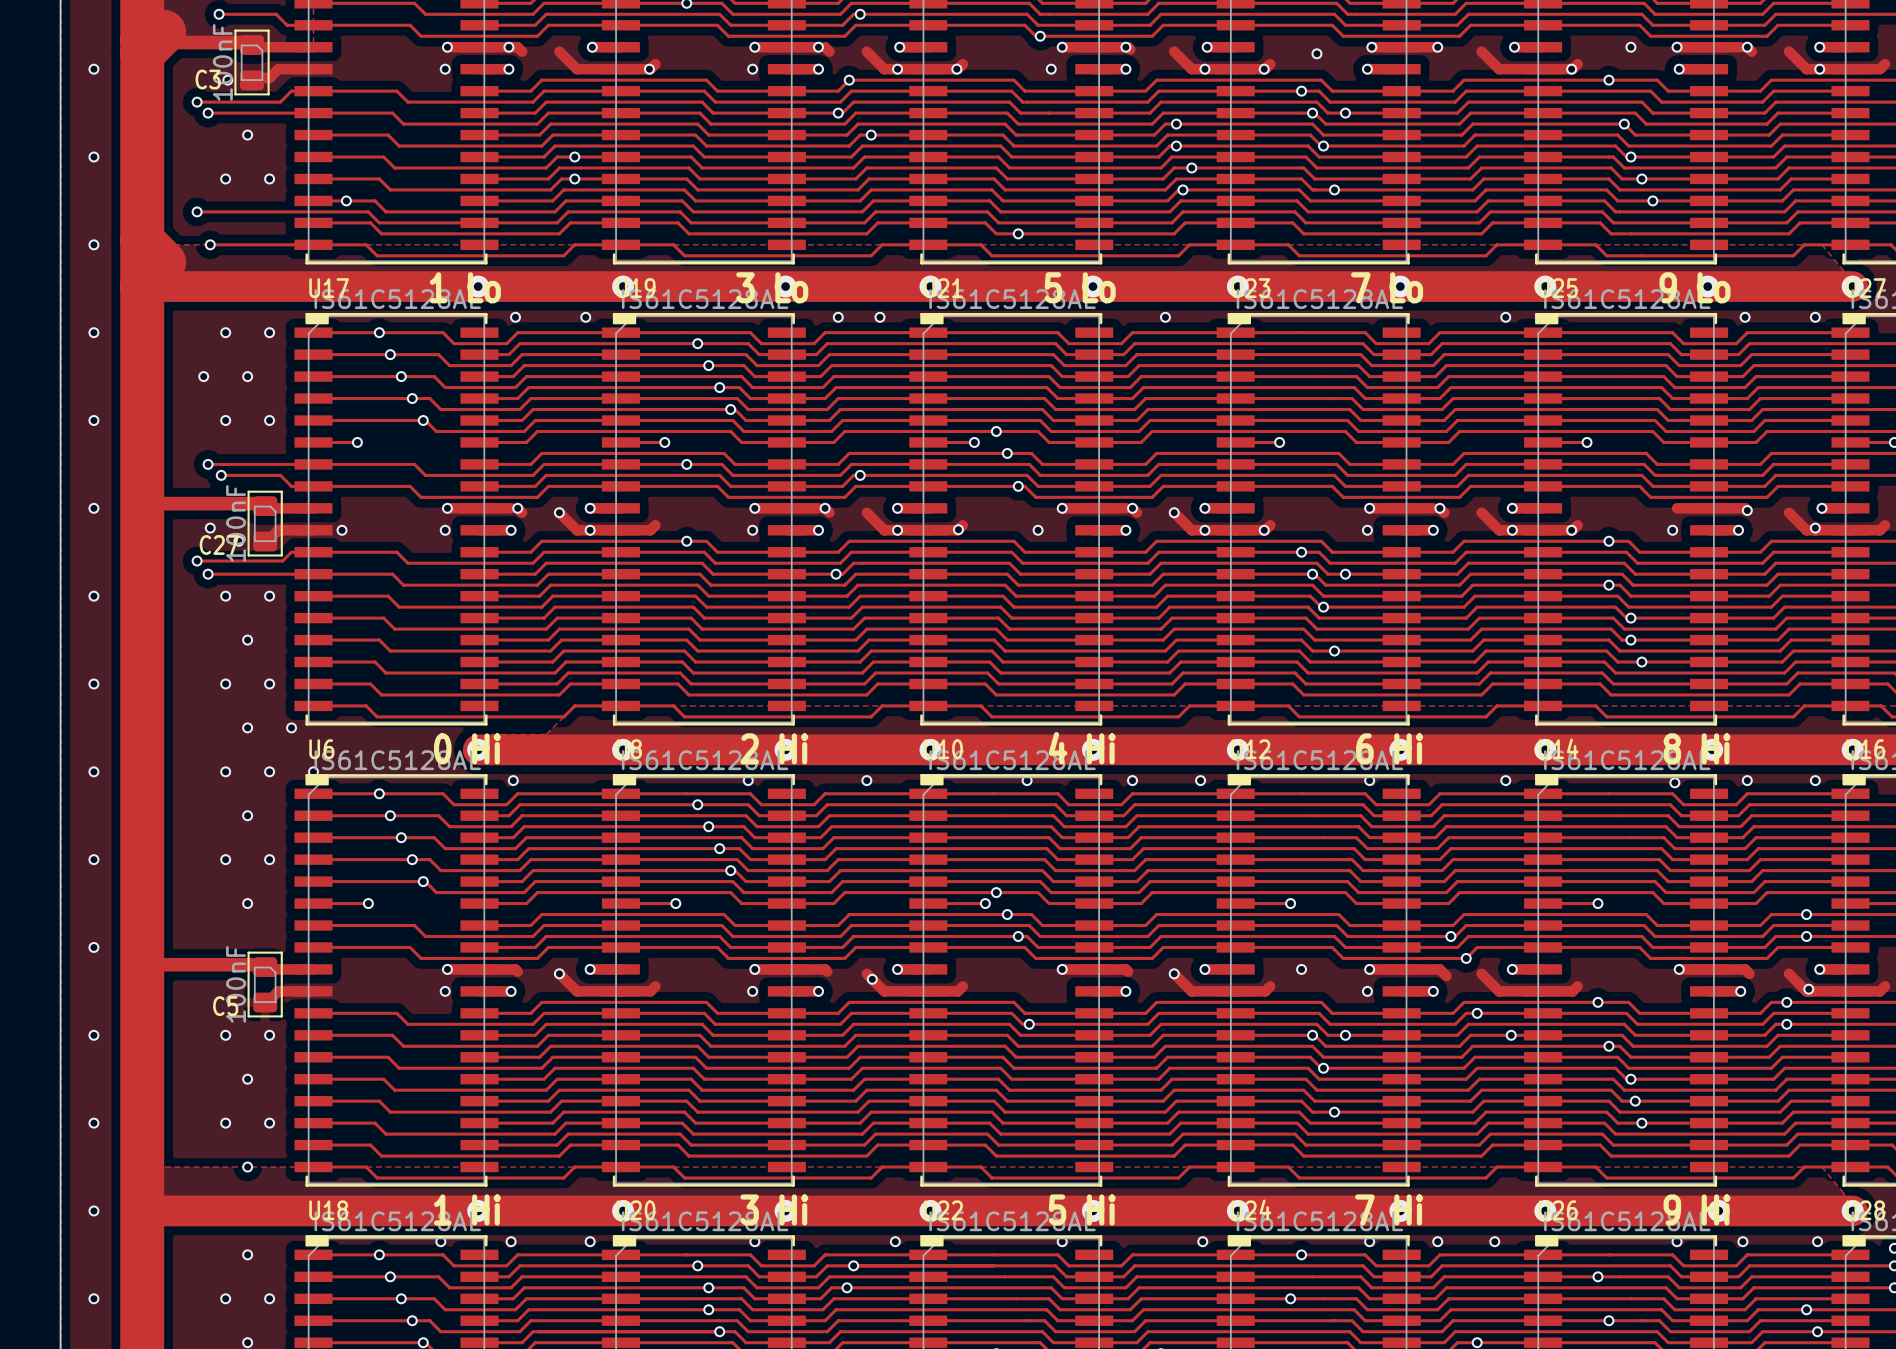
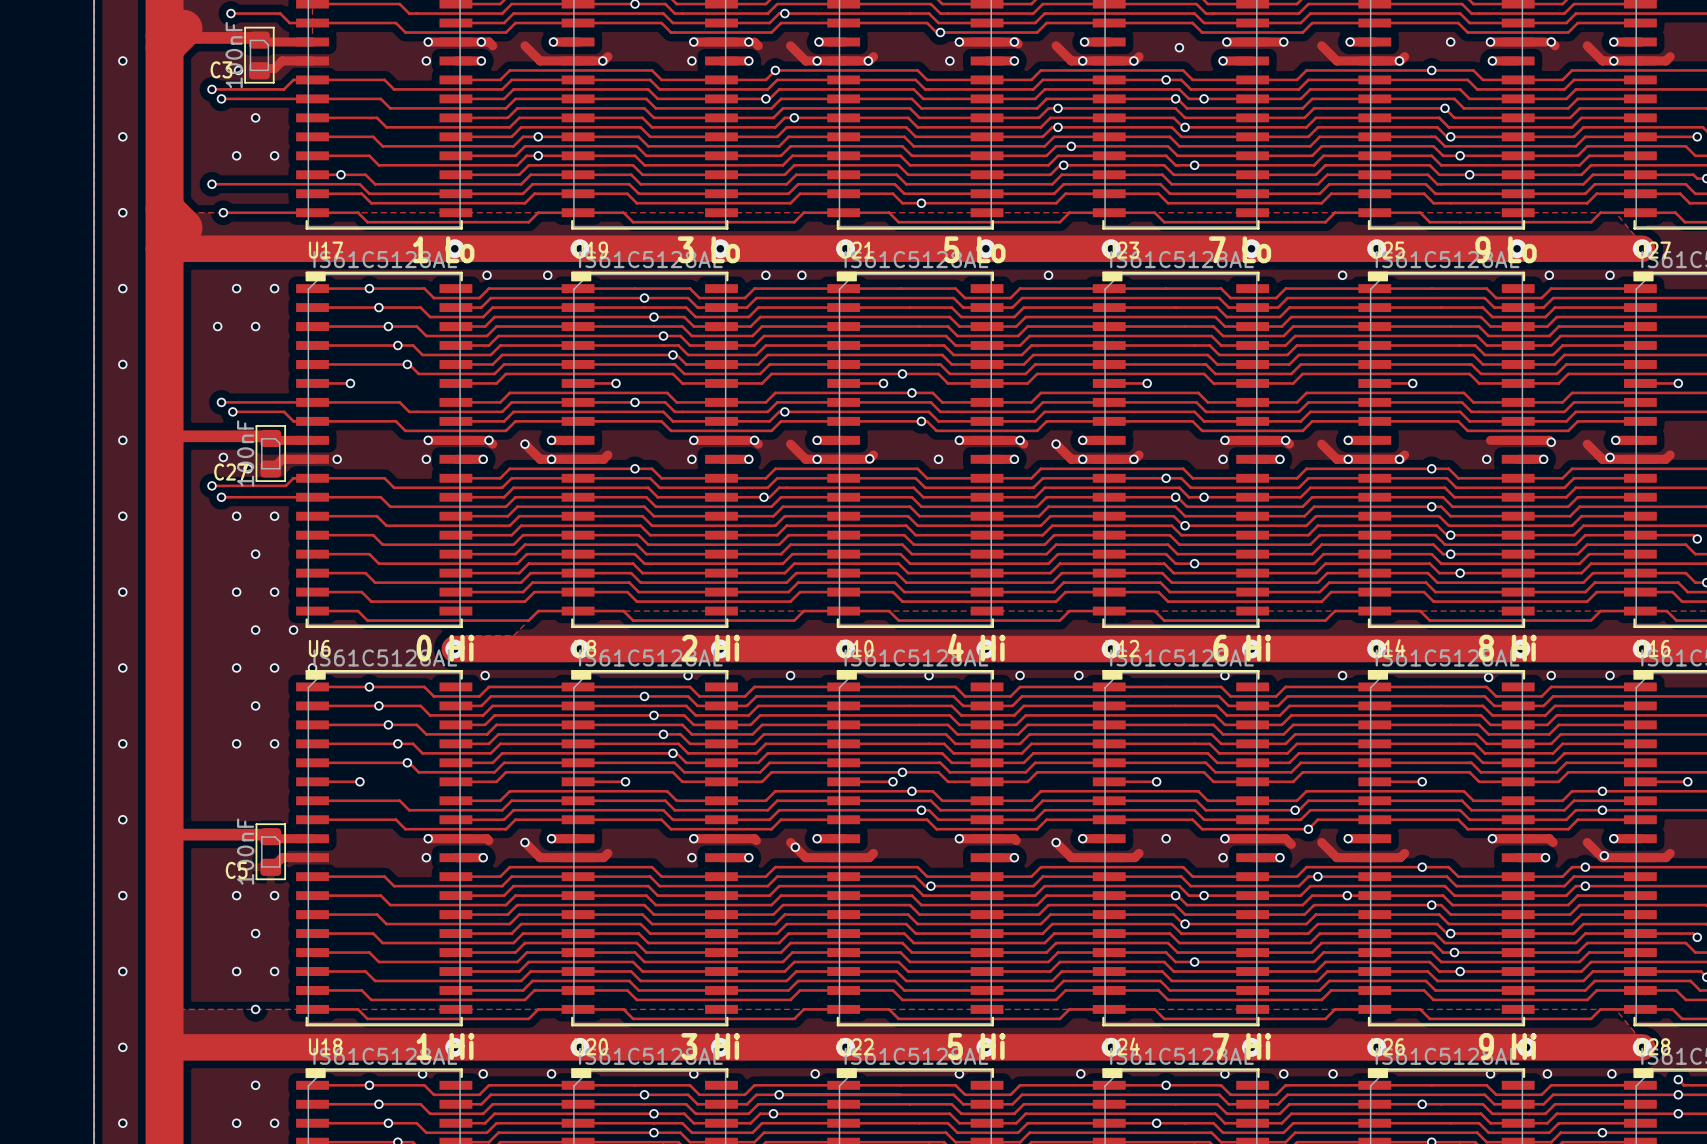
via: (225, 420) -> none
via: (269, 420) -> none
via: (247, 903) -> none

